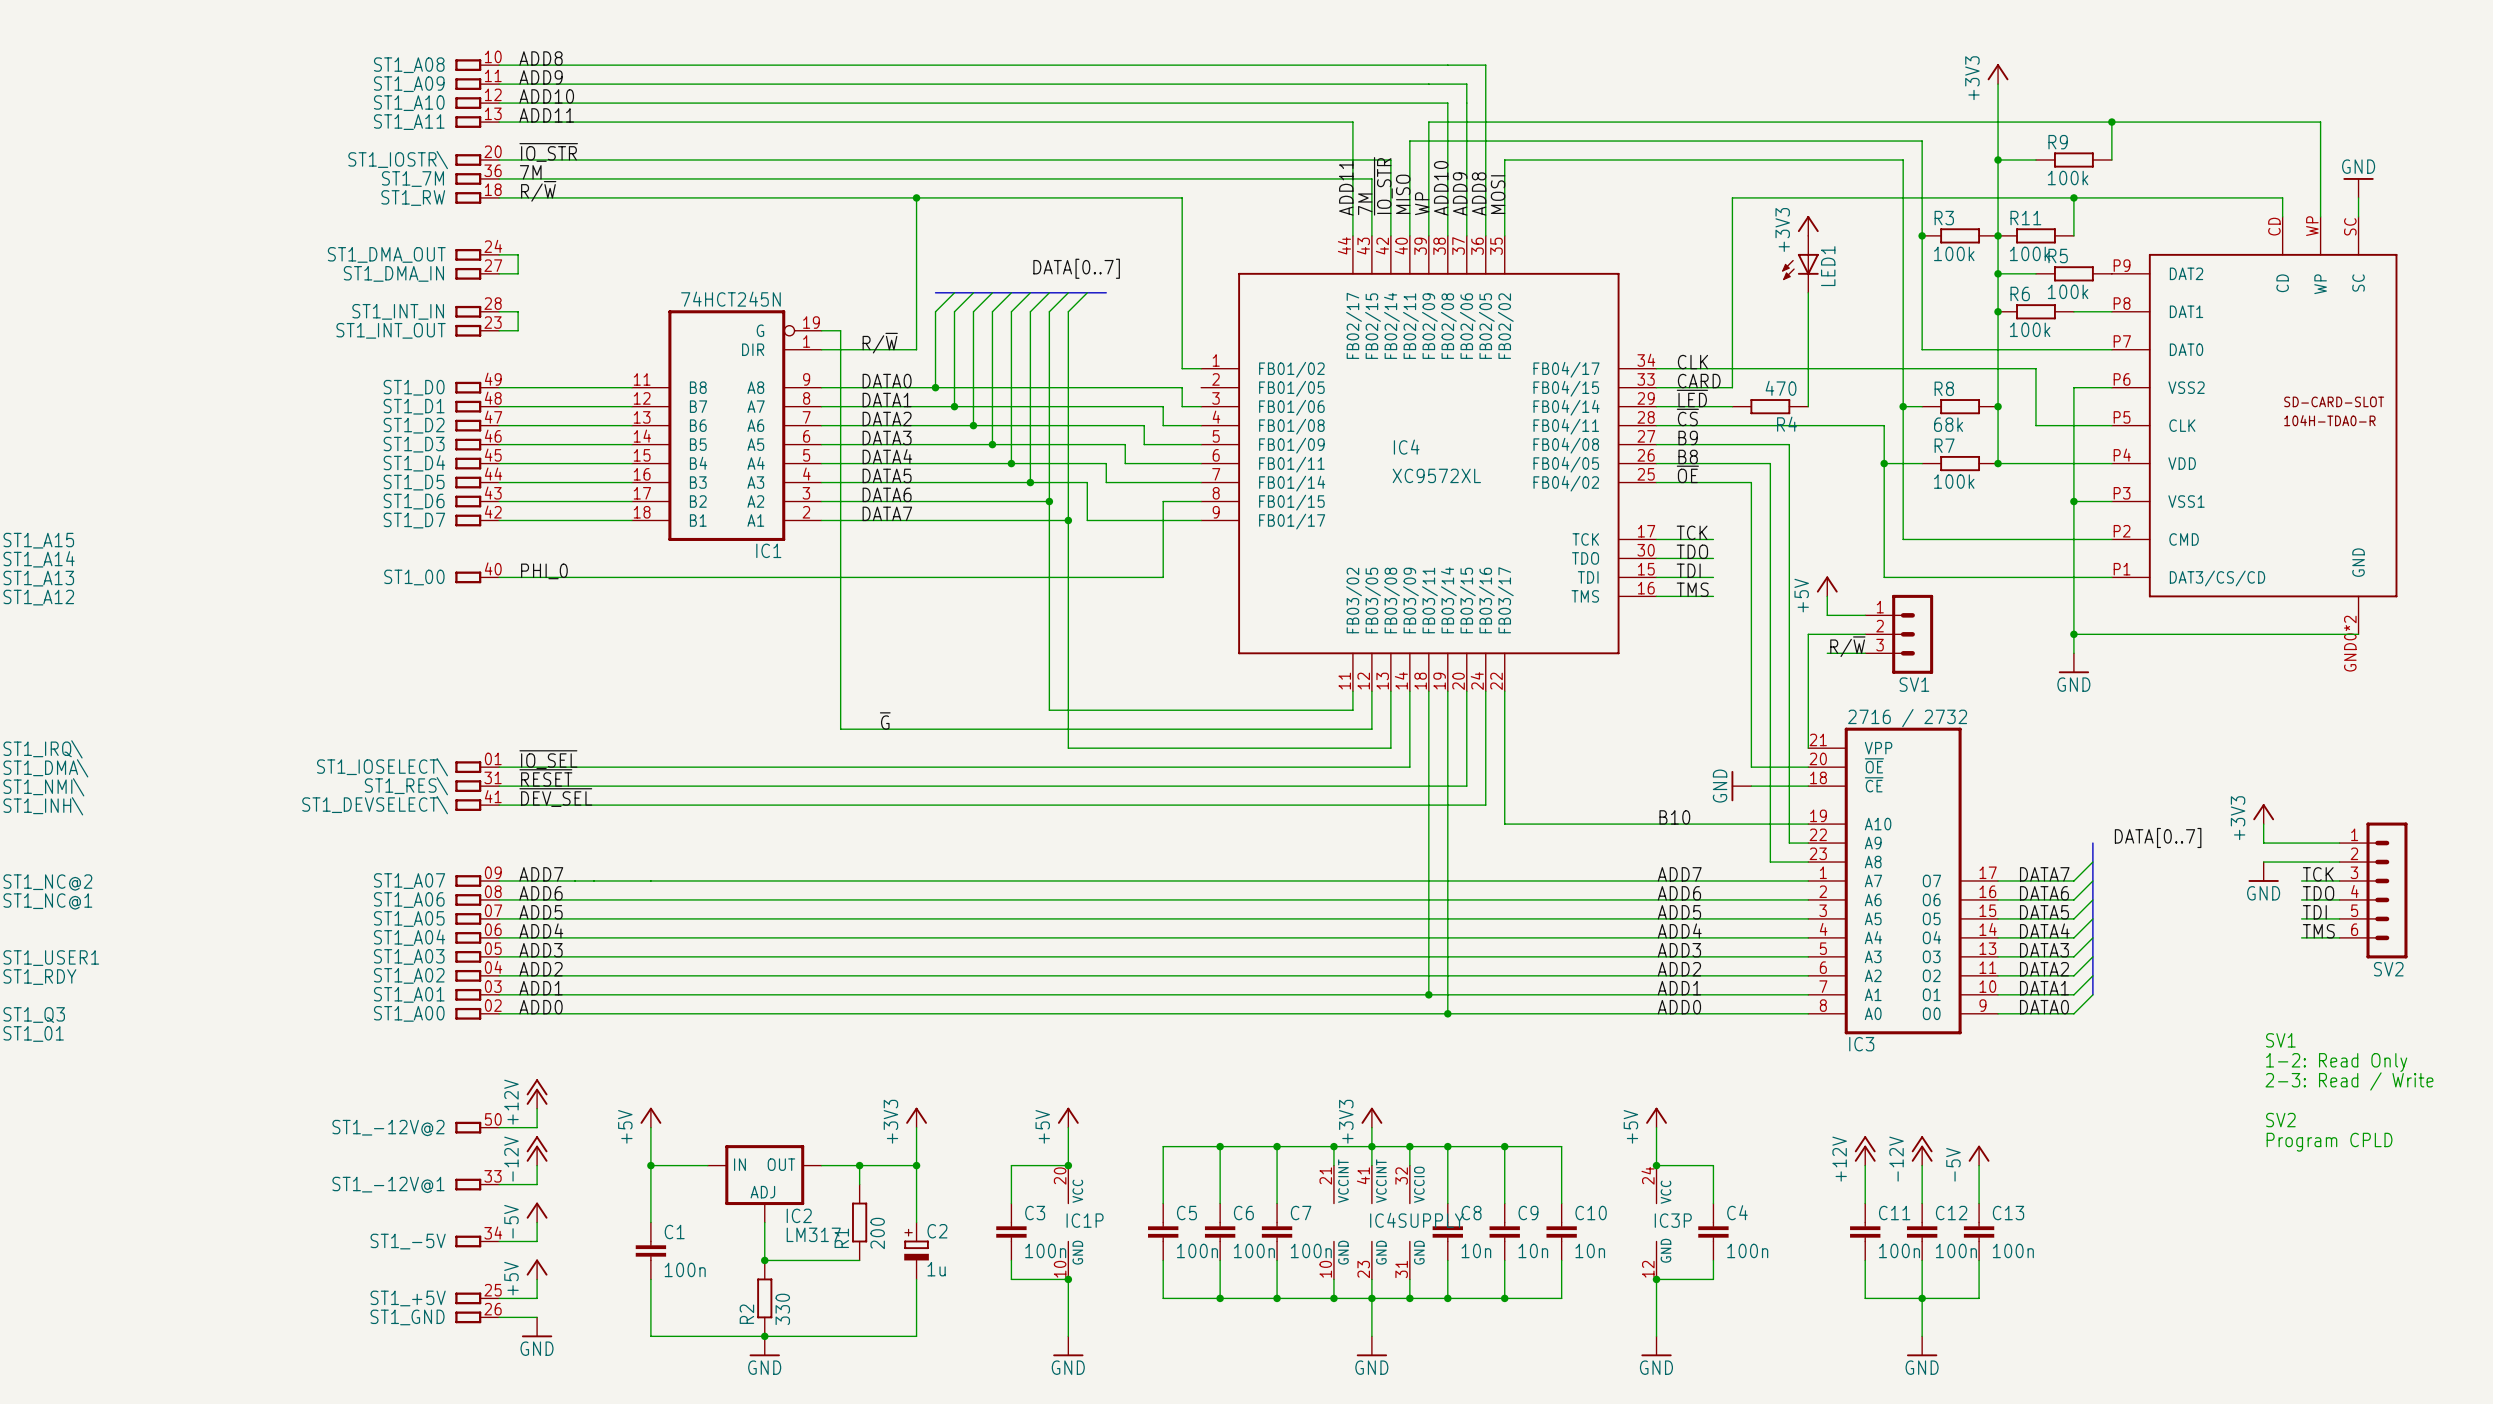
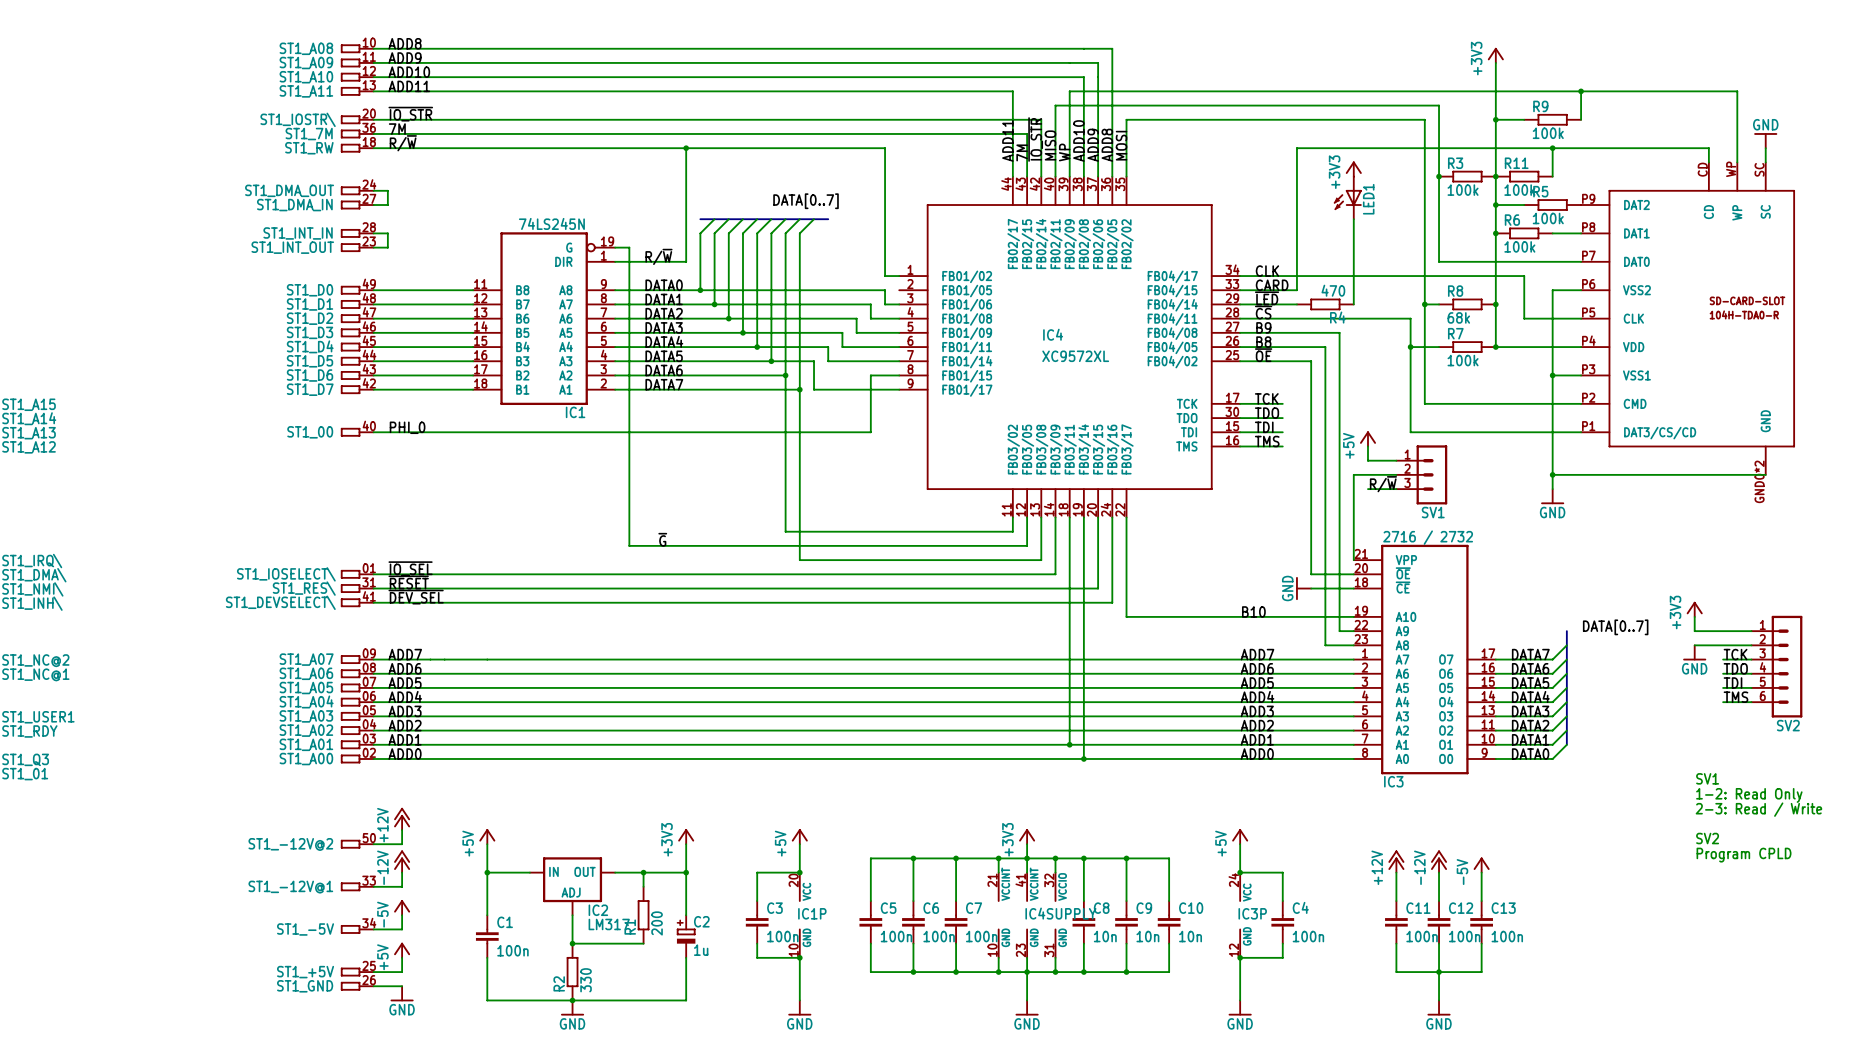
IC1 value: 74HCT245N (730, 299) -> 74LS245N (551, 223)

